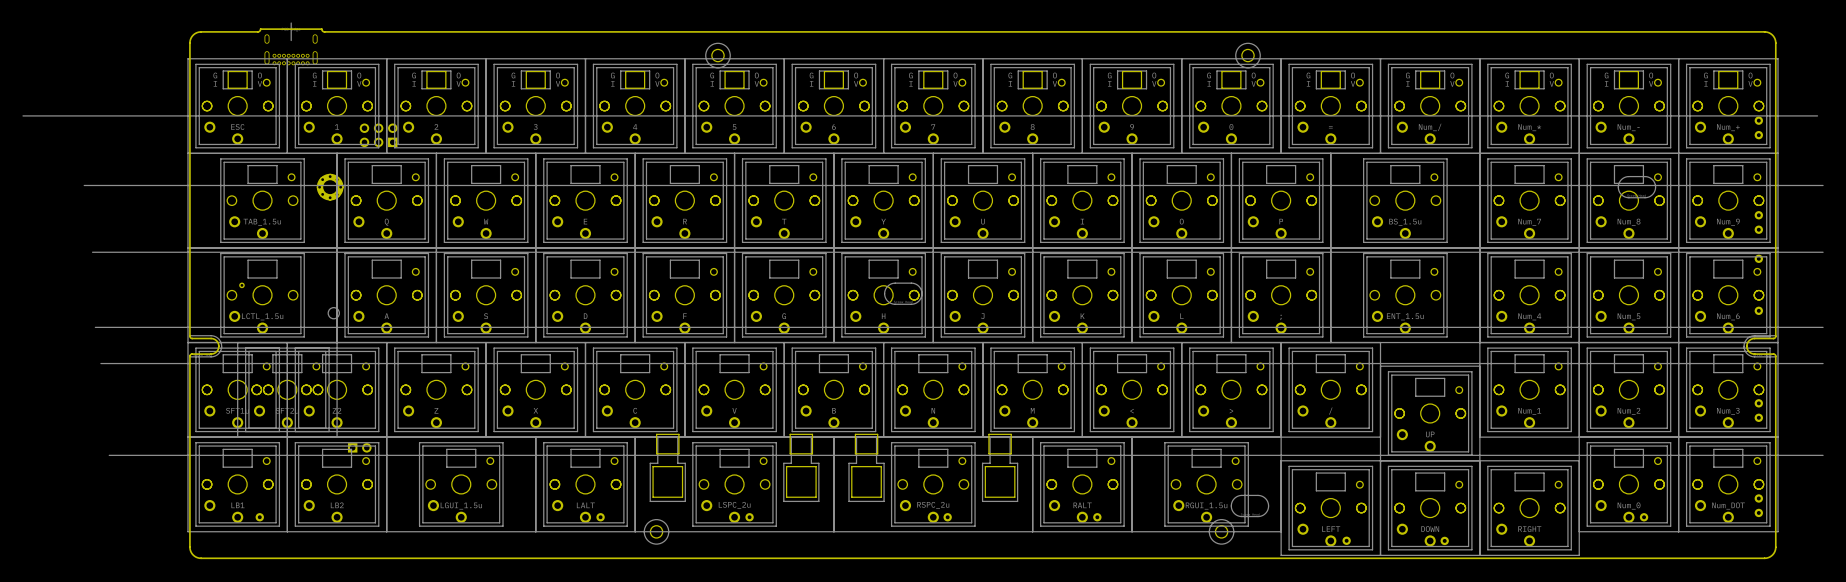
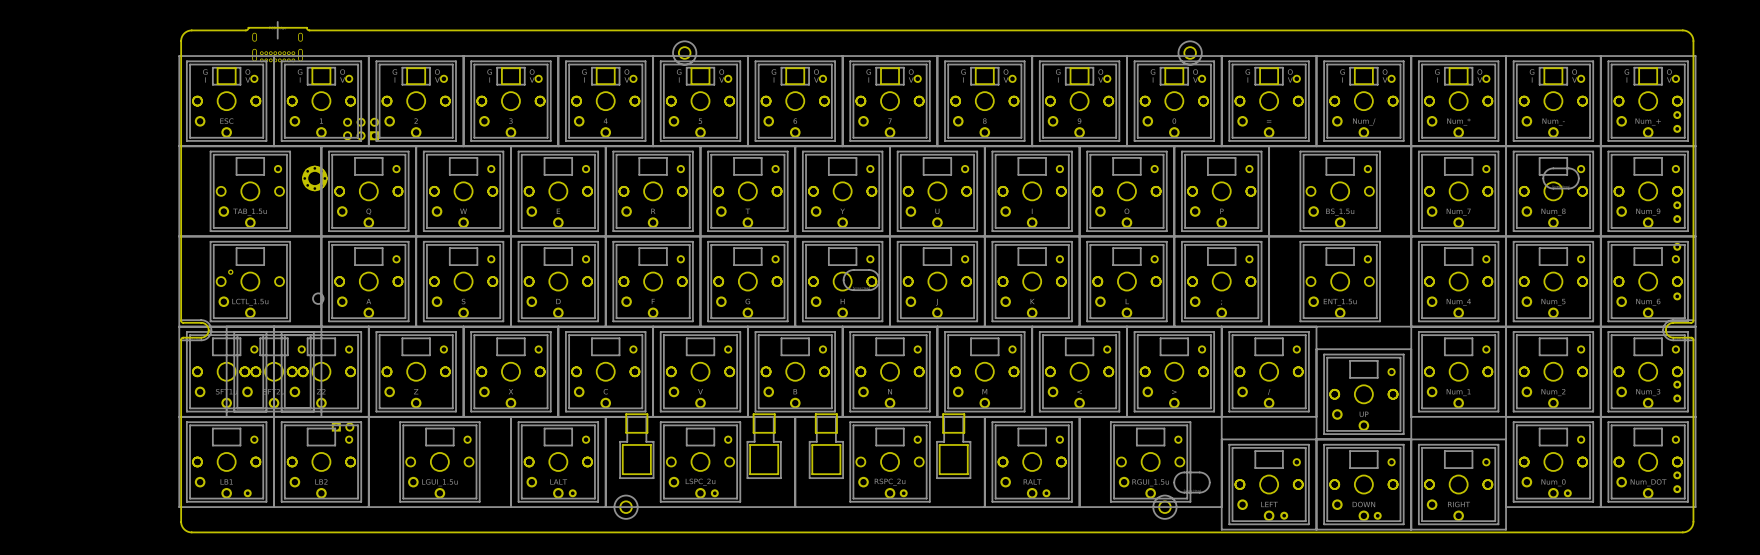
line: (23, 115) (1817, 115) -> none
line: (84, 185) (1823, 185) -> none
line: (92, 252) (1823, 252) -> none
line: (95, 327) (1823, 327) -> none
line: (100, 363) (1823, 363) -> none
line: (109, 455) (1823, 455) -> none

